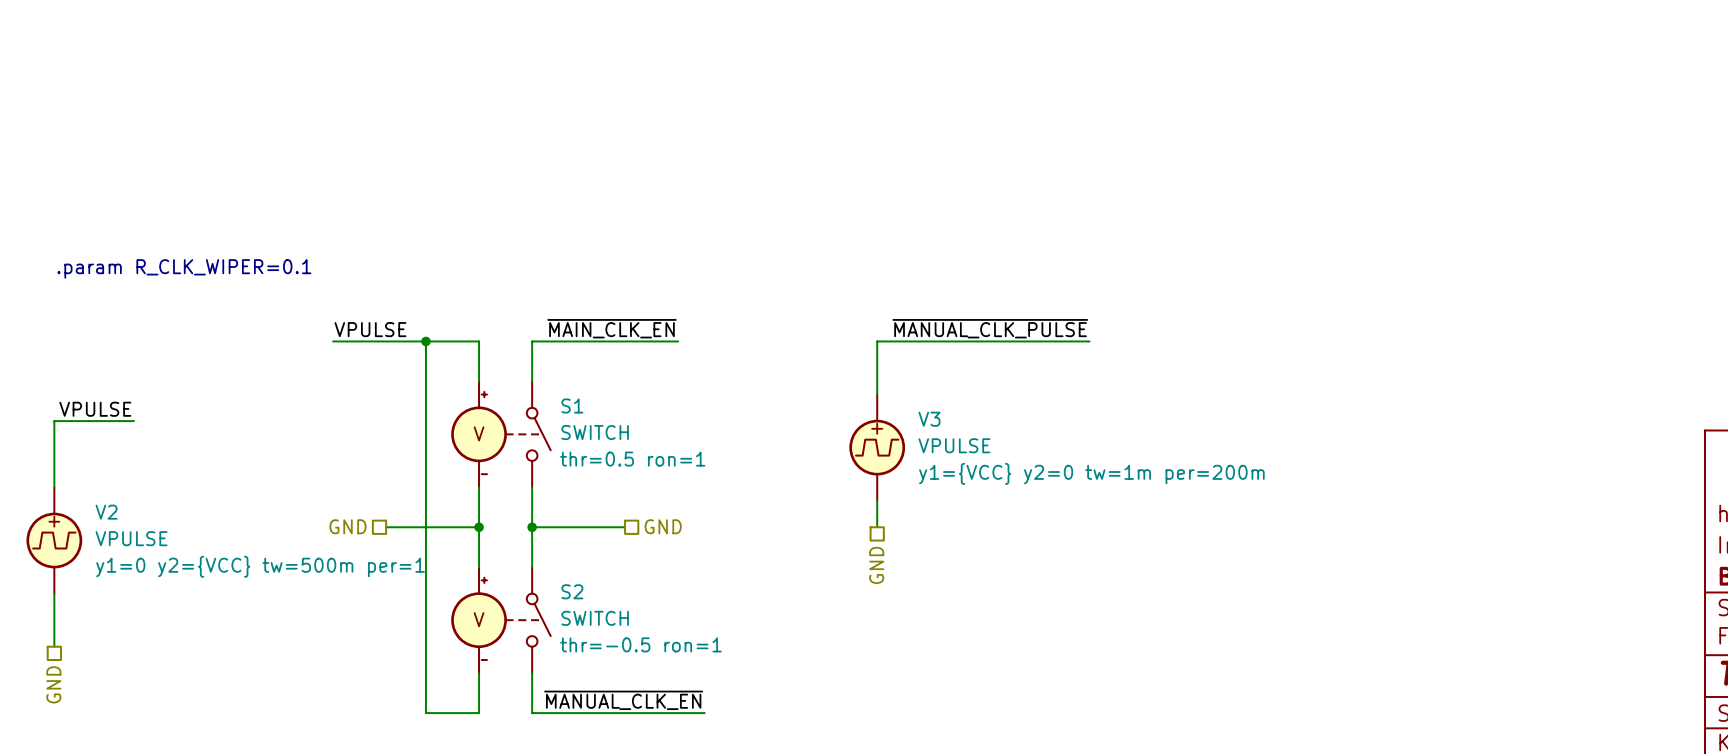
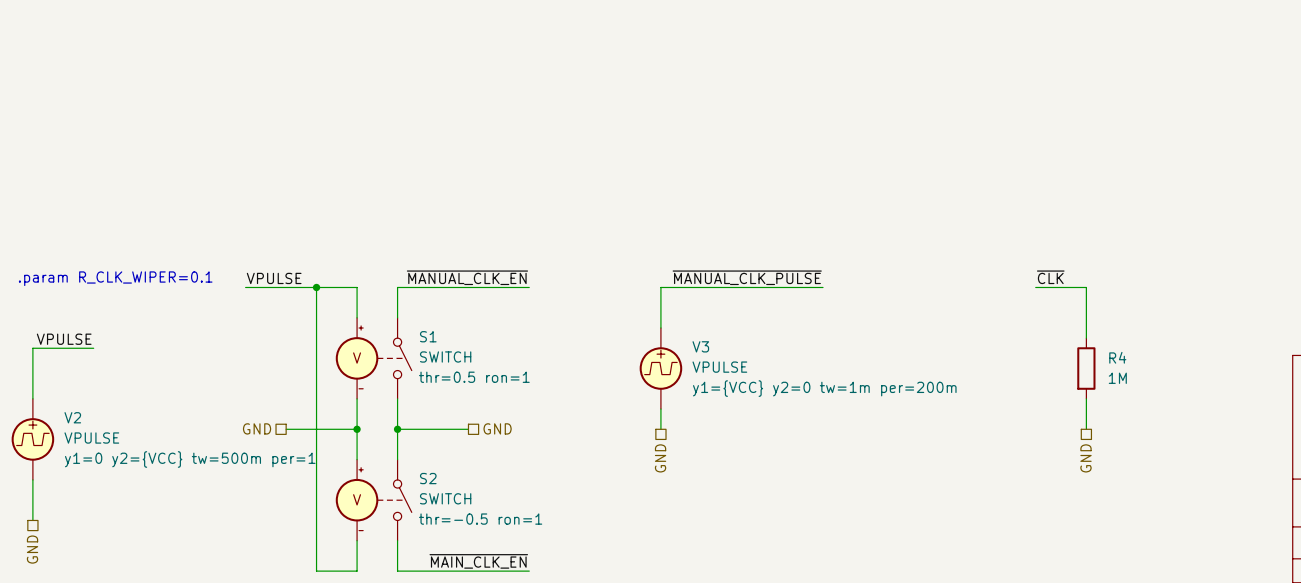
text position: .param R_CLK_WIPER=0.1 (184, 268) -> .param R_CLK_WIPER=0.1 (115, 278)
label: ~{MAIN_CLK_EN} (611, 328) -> ~{MANUAL_CLK_EN} (467, 277)
label: none -> ~{CLK} (1050, 277)
wire: none -> (508, 287) (529, 287)
wire: none -> (1035, 287) (1086, 287) (1086, 338)
R4: none -> 1M (1086, 368)
wire: none -> (1086, 398) (1086, 429)
hierarchical label: none -> GND (1086, 458)
label: ~{MANUAL_CLK_EN} (623, 700) -> ~{MAIN_CLK_EN} (478, 561)

